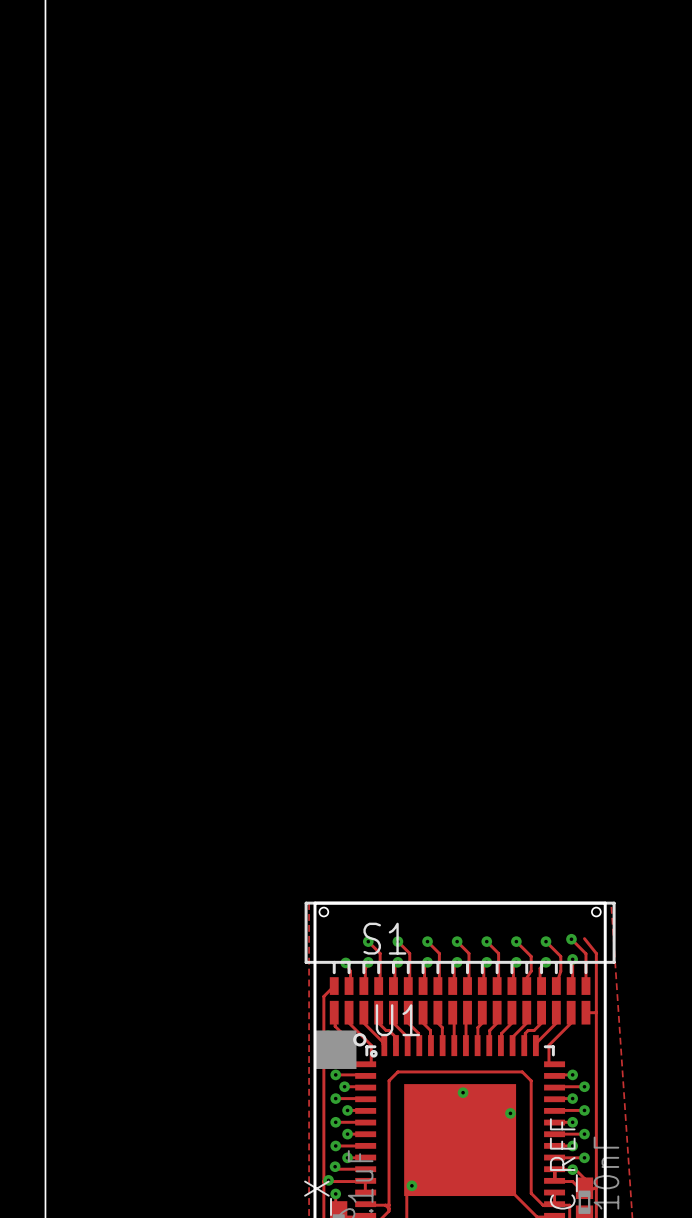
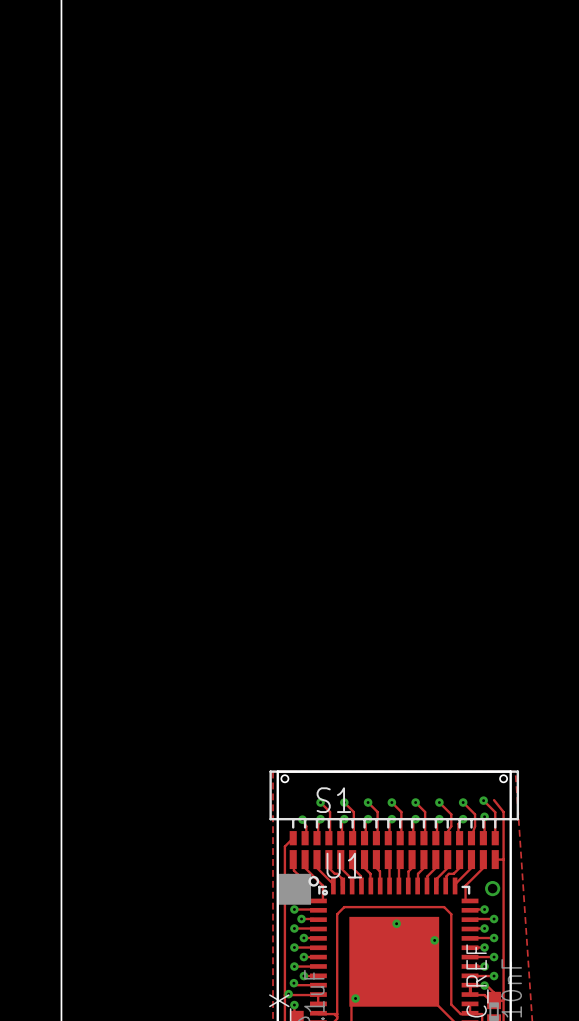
via: none -> (492, 888)

